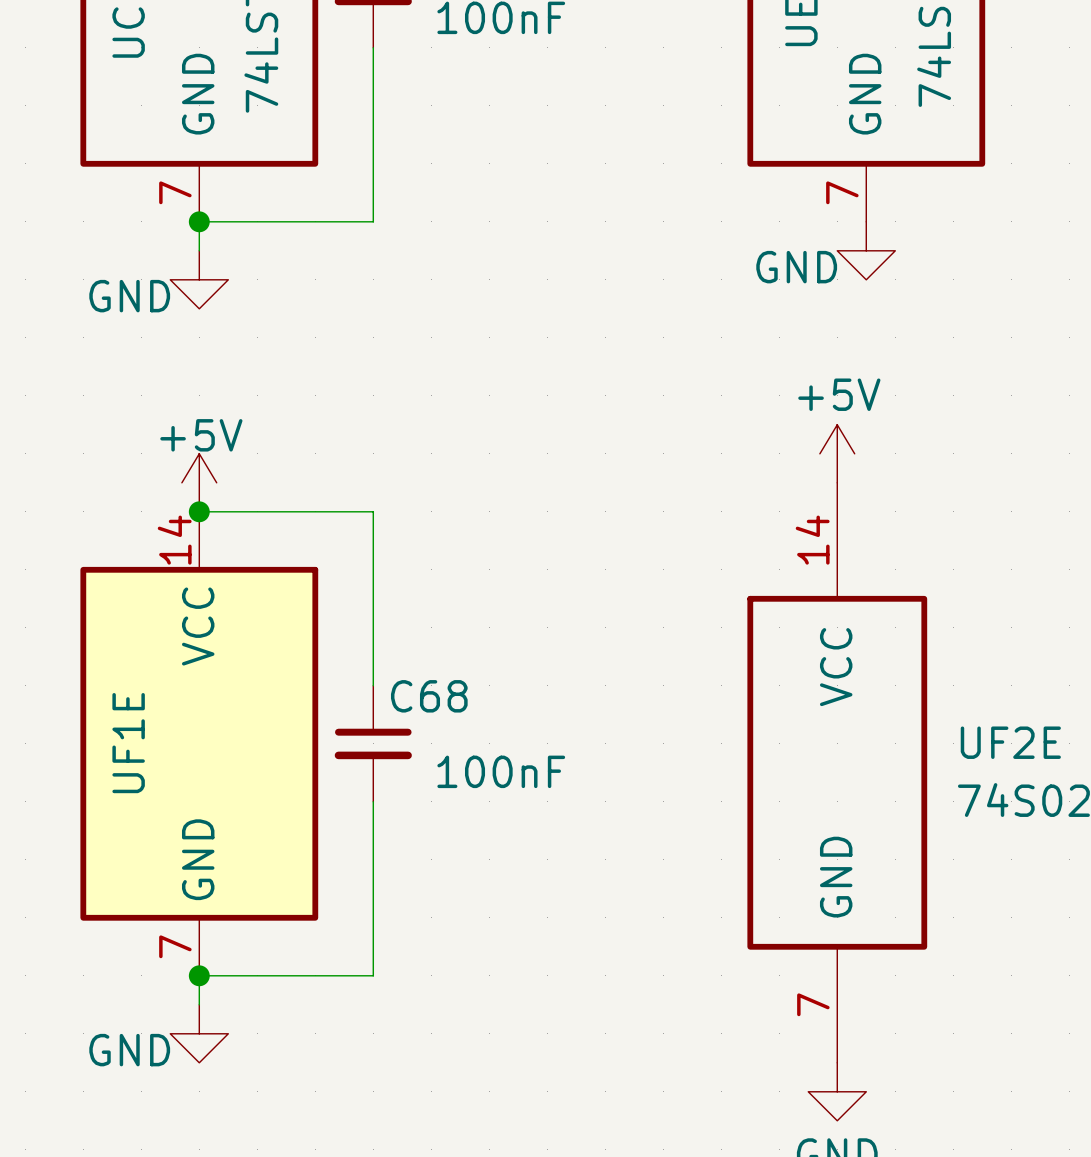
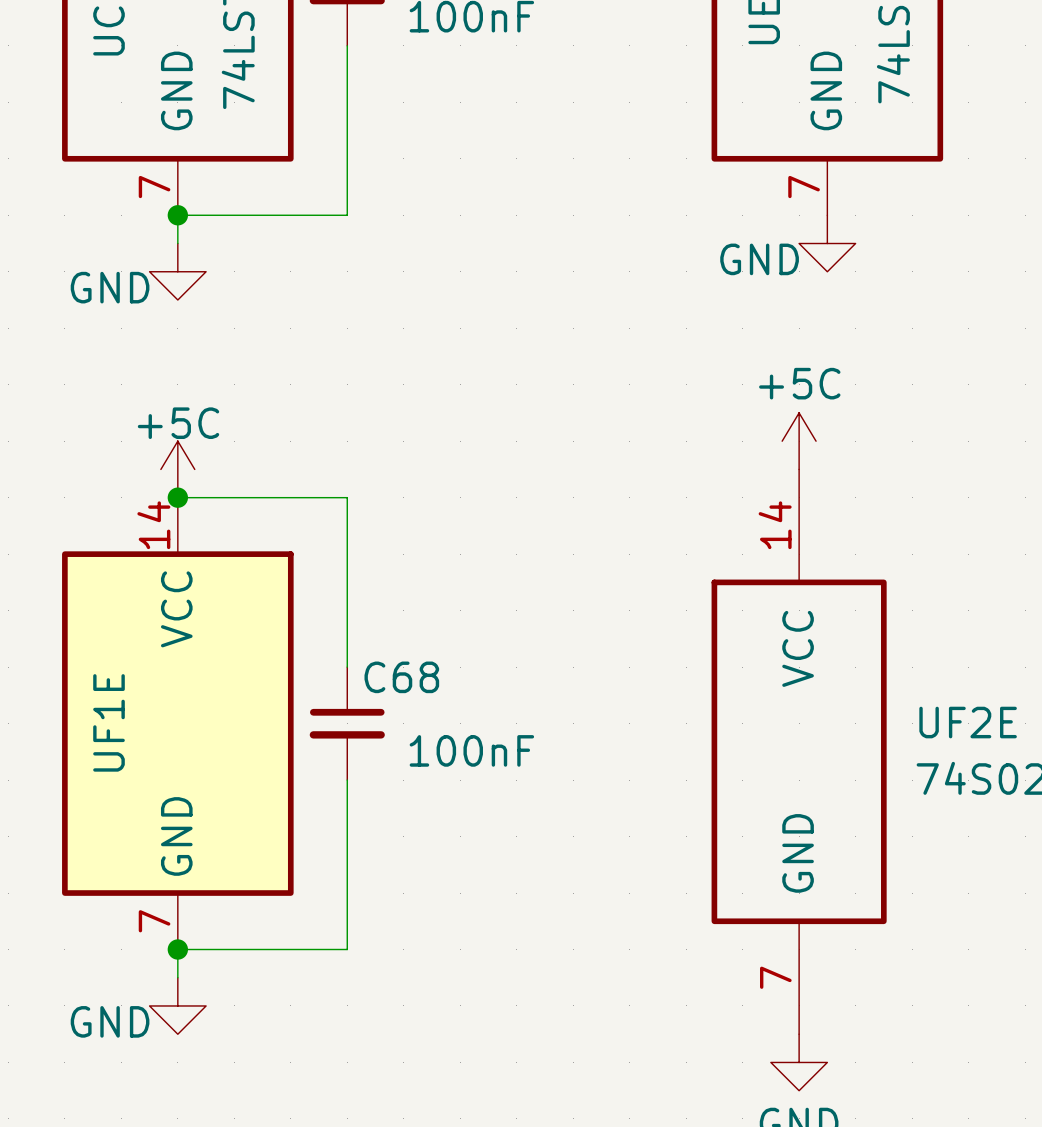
power symbol: +5V (837, 453) -> +5C (799, 441)
power symbol: +5V (199, 482) -> +5C (177, 469)

